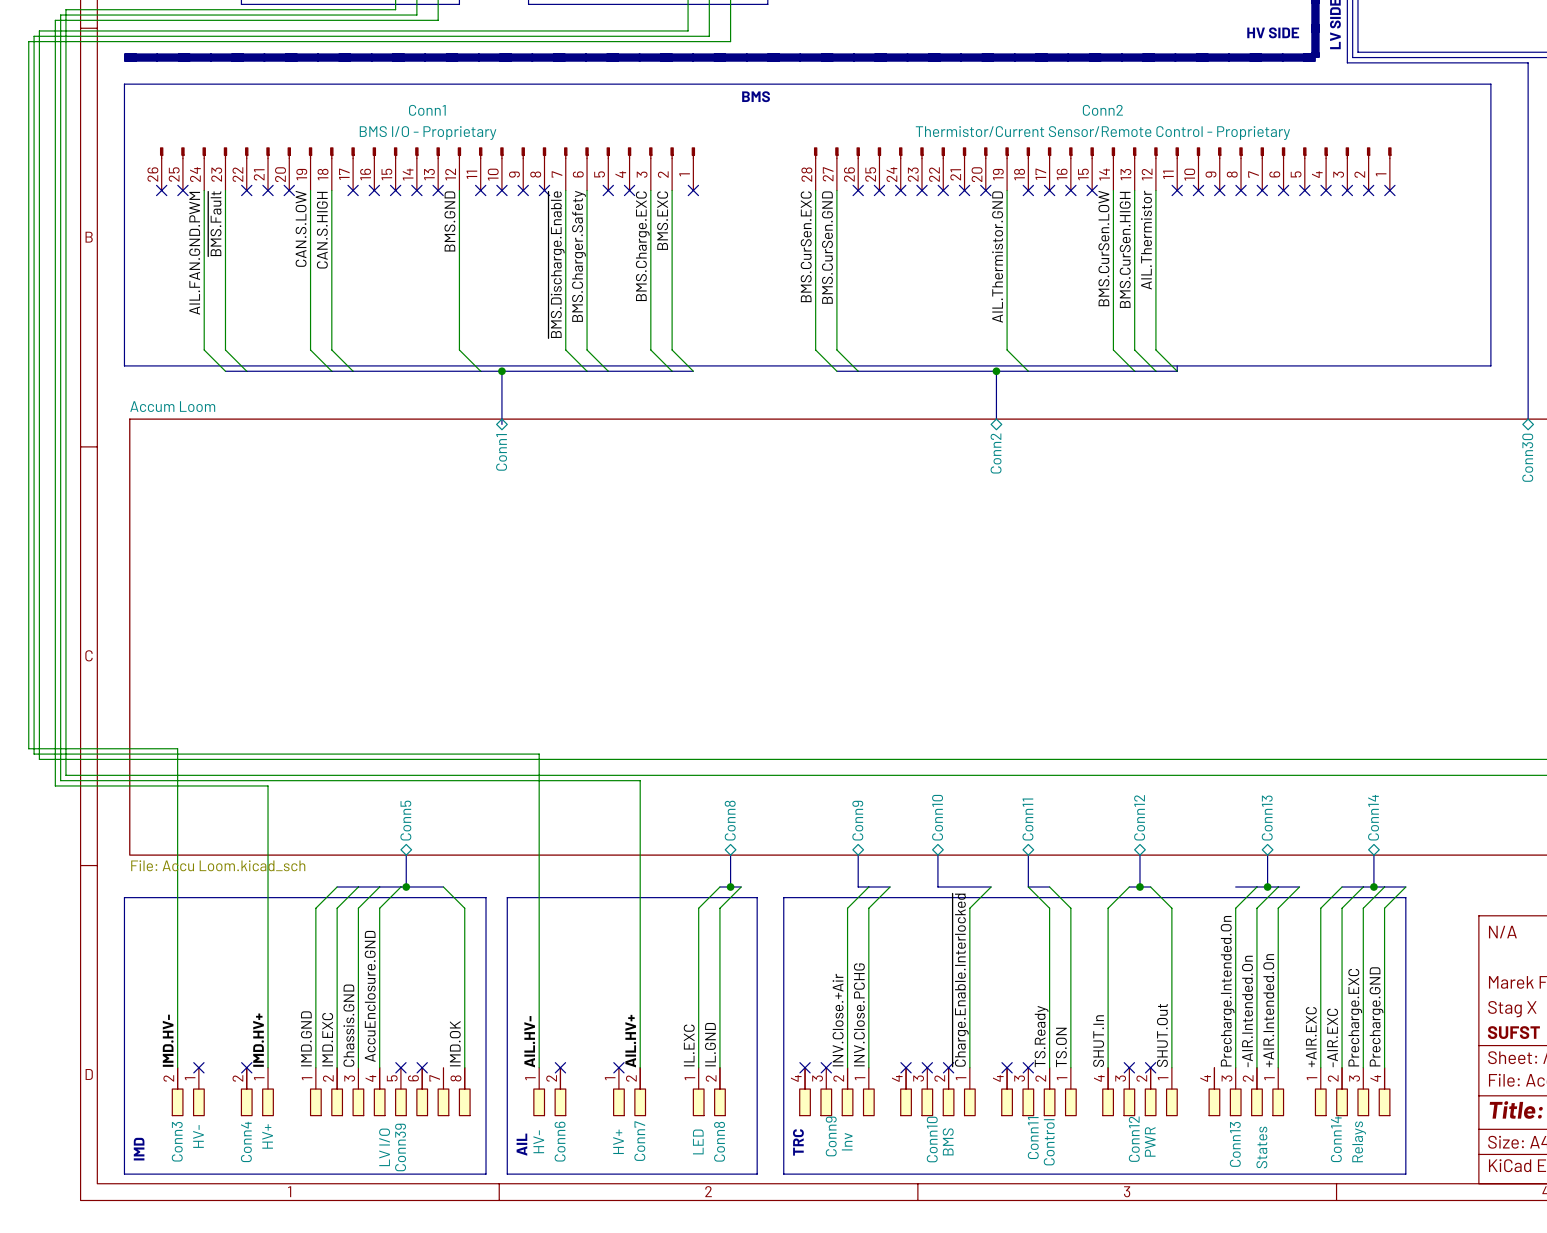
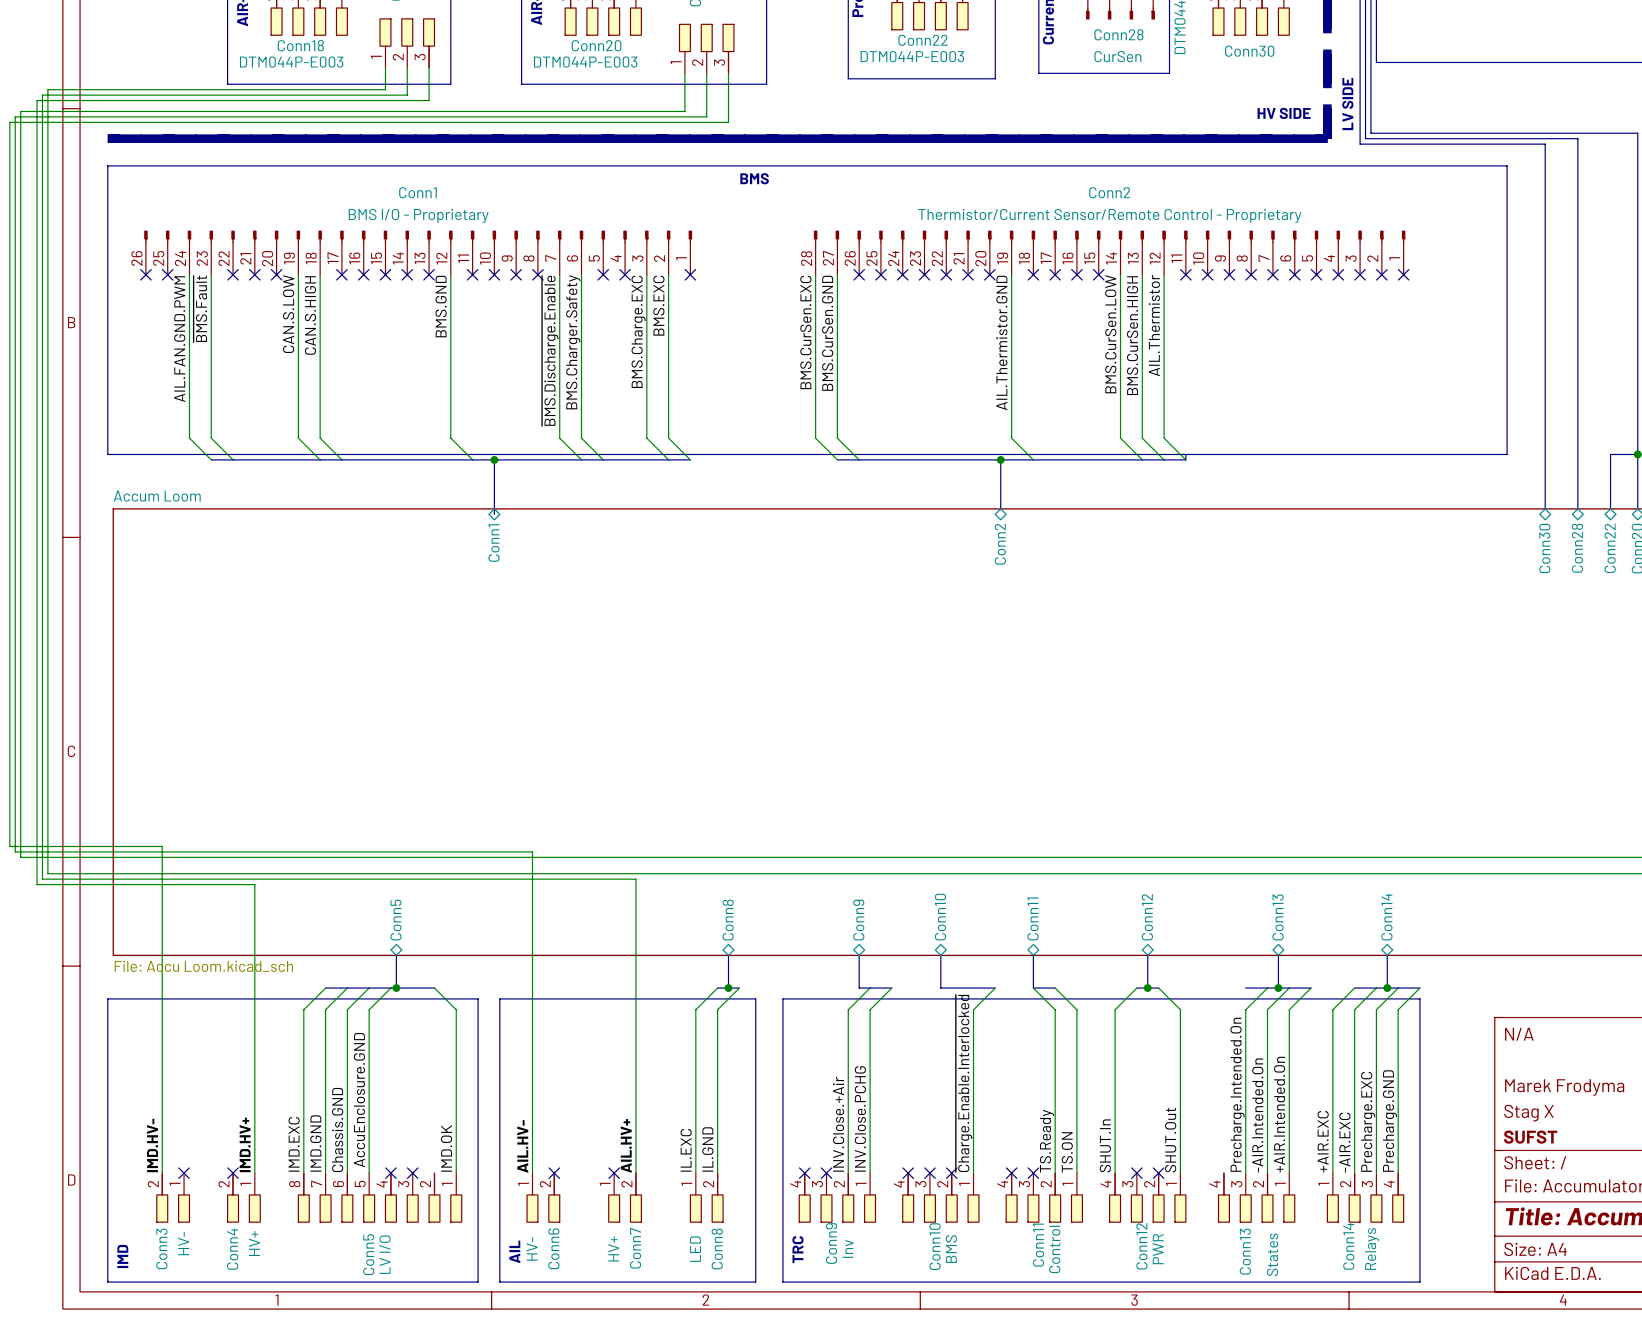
label: IMD.GND (306, 1038) -> IMD.EXC (294, 1144)
label: IMD.EXC (327, 1039) -> IMD.GND (315, 1143)
Conn39: (390, 1091) -> none
Conn5: none -> (380, 1197)

